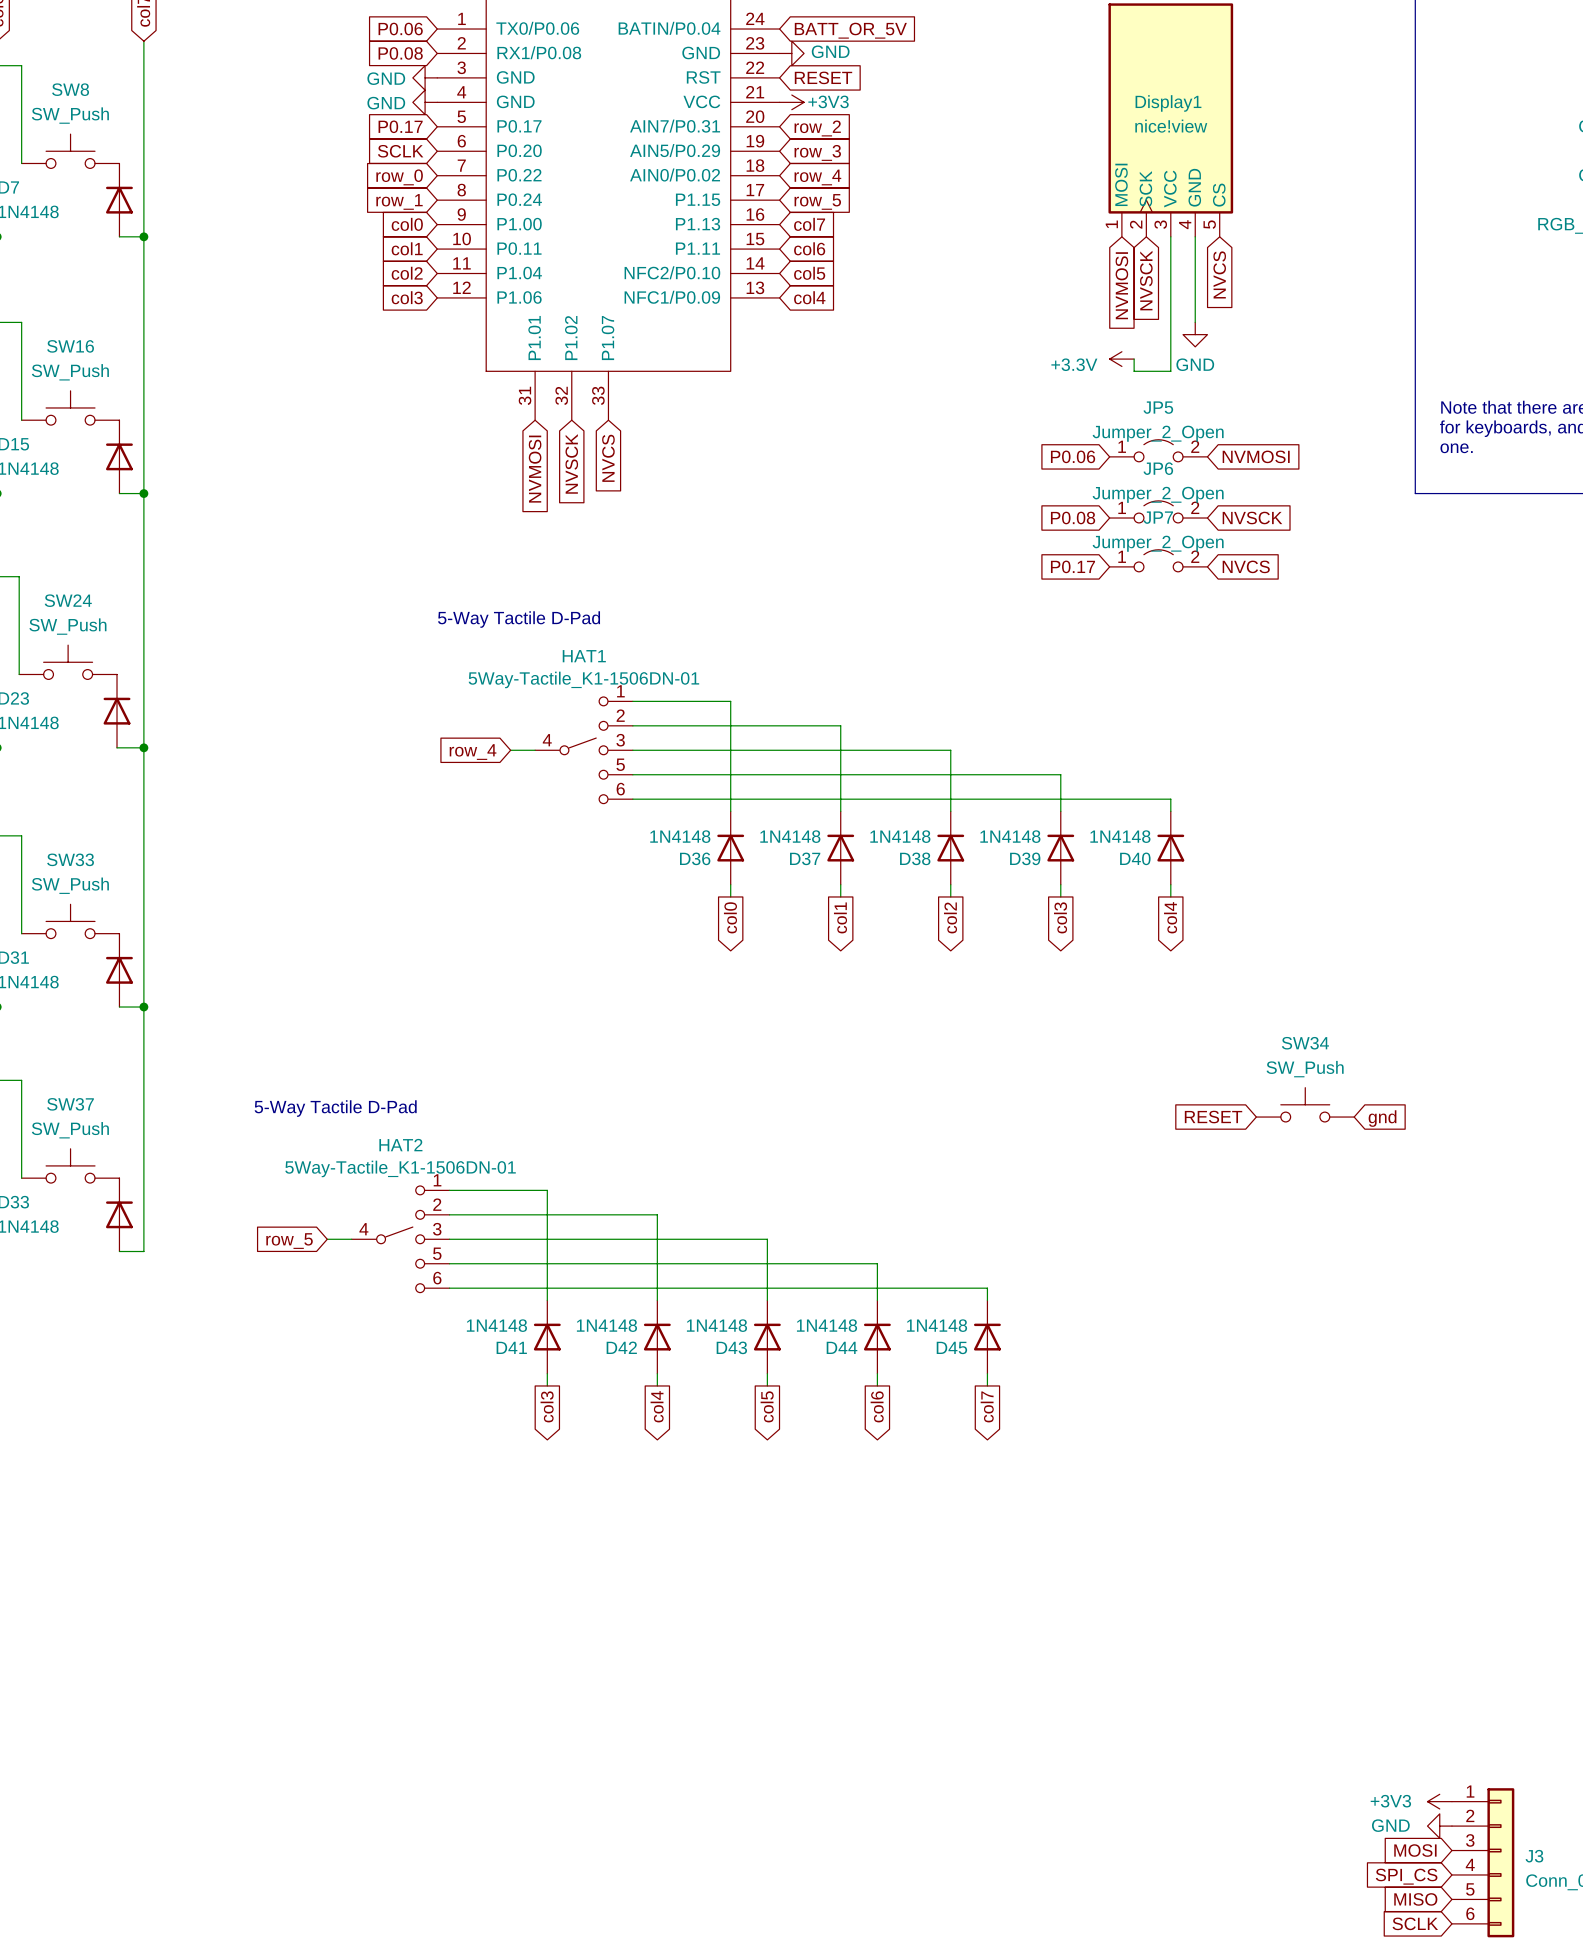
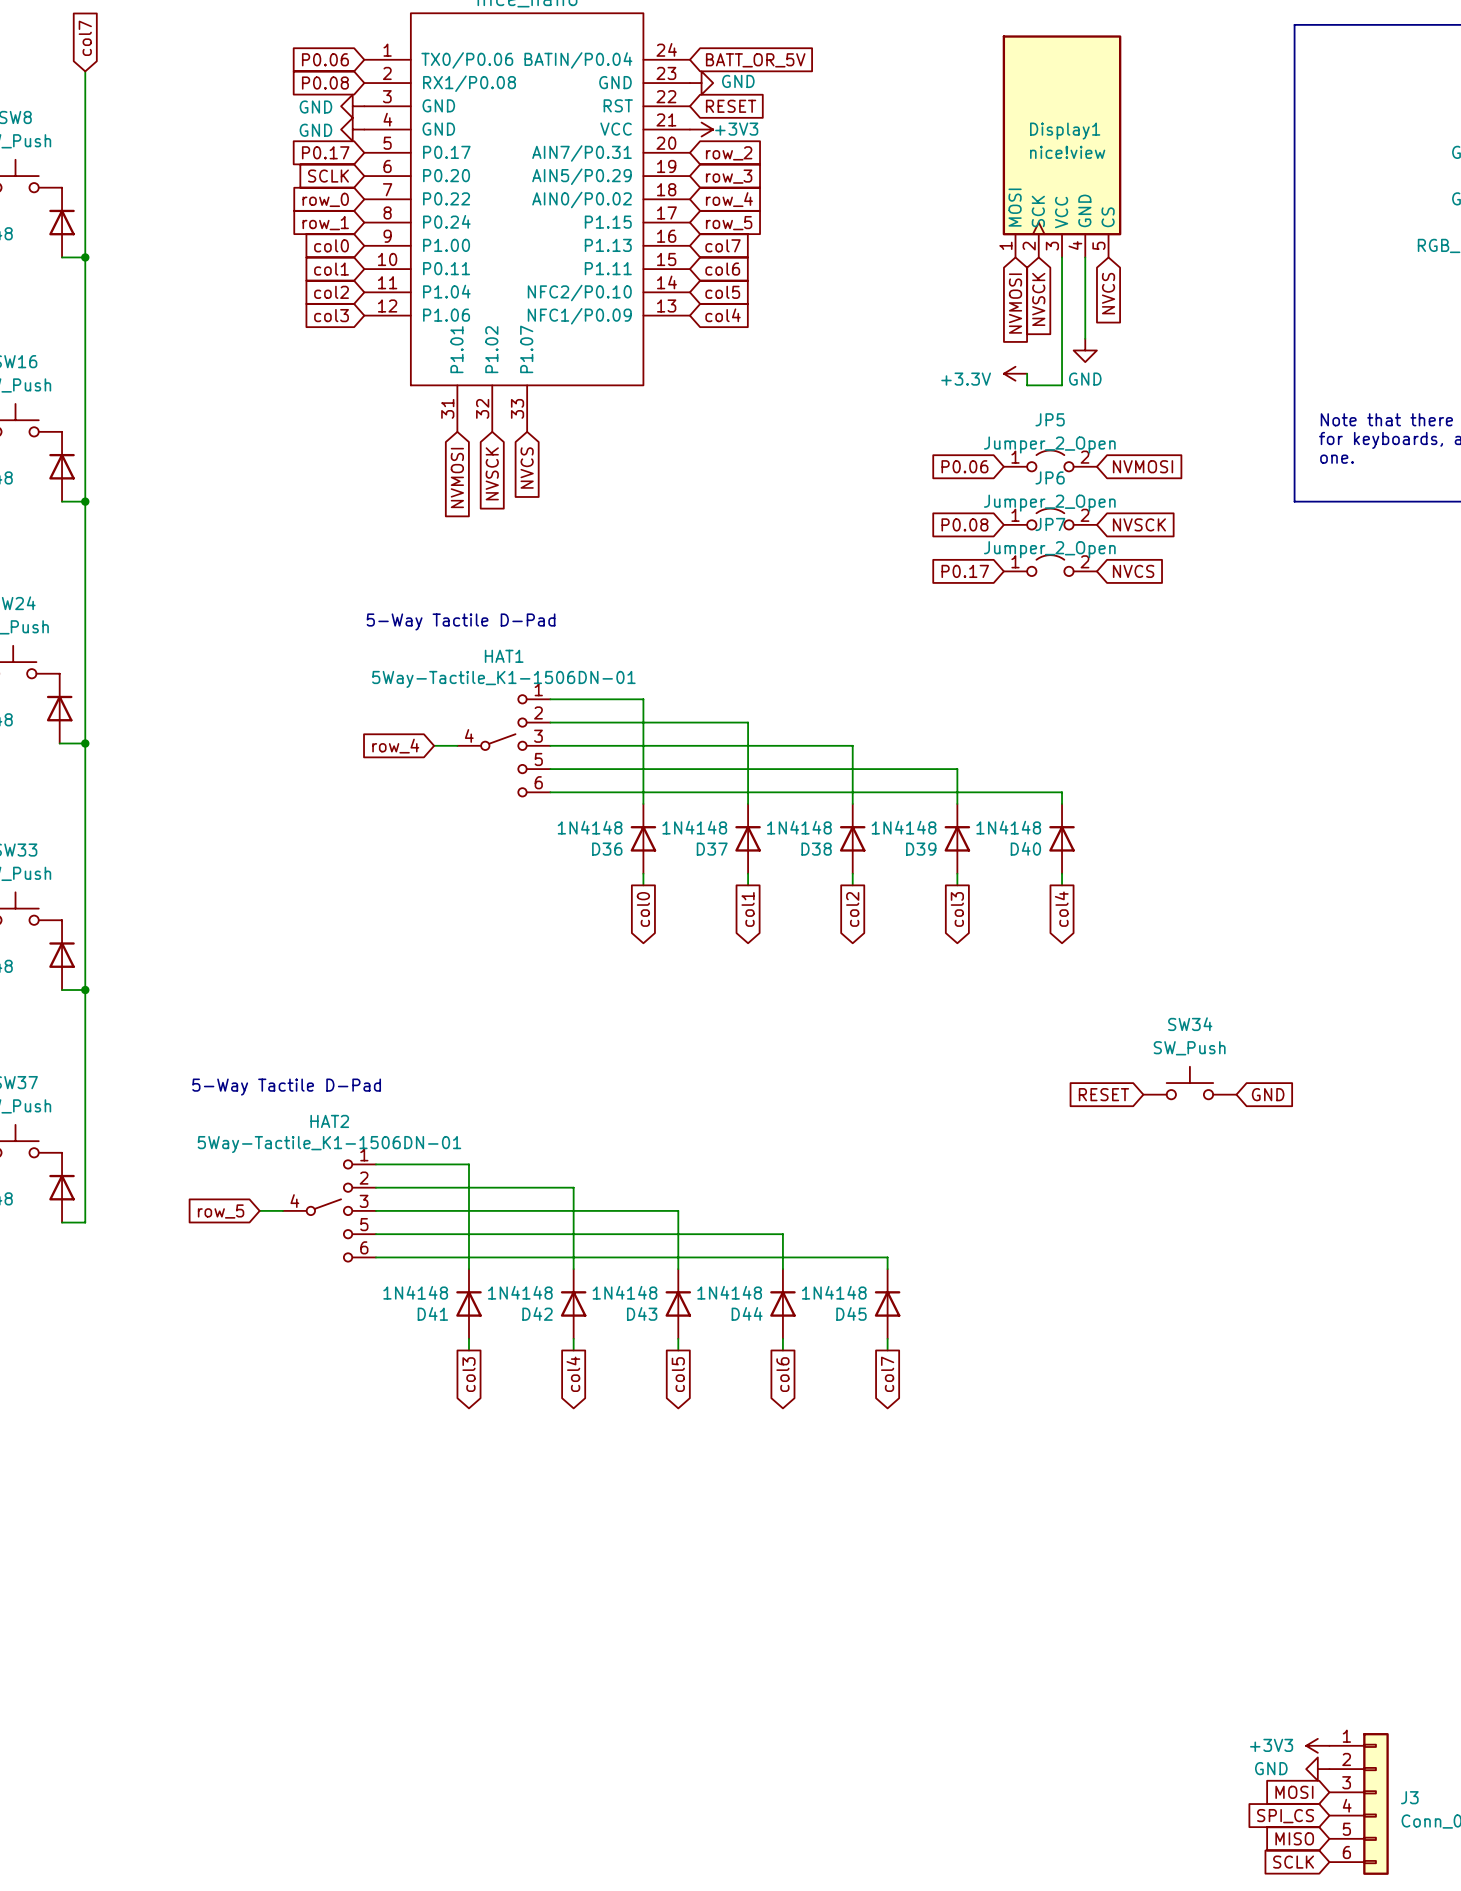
global label: gnd (1382, 1118) -> GND (1268, 1094)

